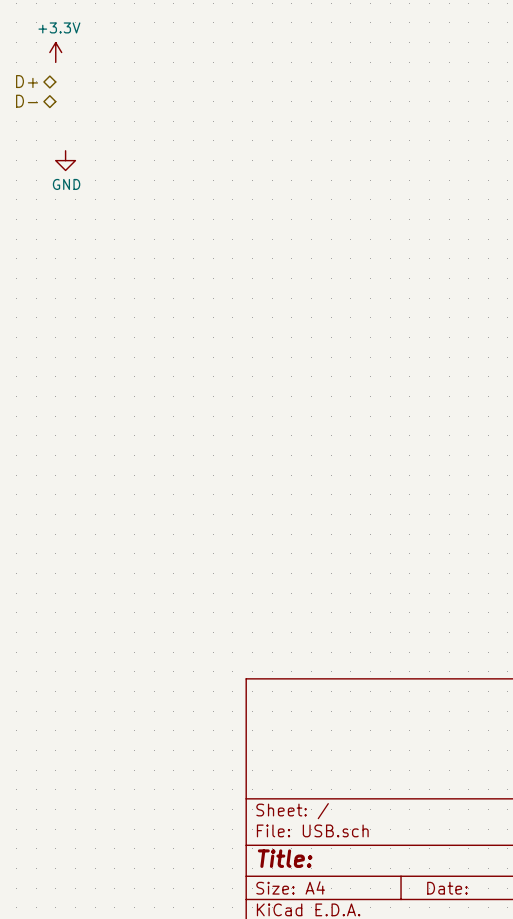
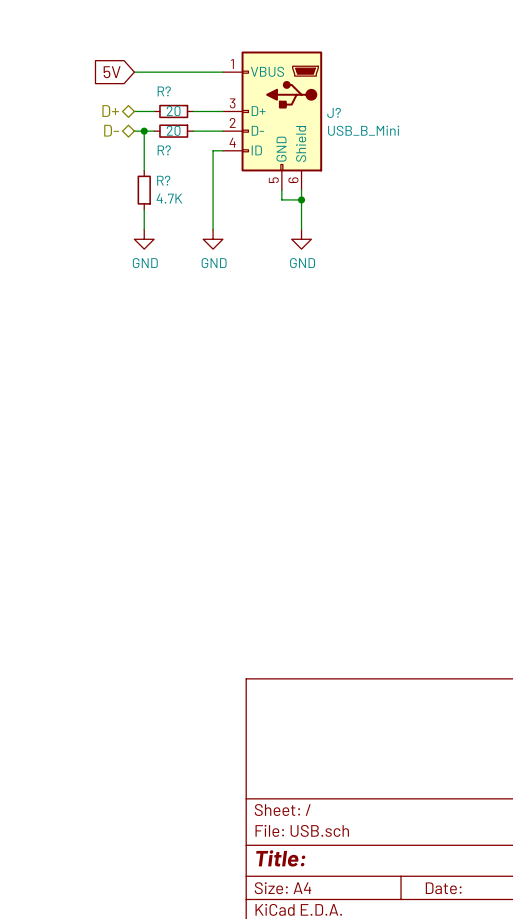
power symbol: +3.3V (55, 52) -> none
global label: none -> 5V (112, 72)
wire: none -> (134, 72) (222, 72)
hierarchical label position: D+ (27, 81) -> D+ (110, 111)
hierarchical label position: D- (27, 101) -> D- (111, 130)
wire: none -> (134, 111) (154, 111)
R?: none -> 20 (173, 111)
wire: none -> (193, 111) (222, 111)
J?: none -> USB_B_Mini (272, 120)
wire: none -> (134, 131) (154, 131)
wire: none -> (144, 131) (144, 170)
junction: none -> (144, 131)
R?: none -> 20 (173, 131)
wire: none -> (193, 131) (222, 131)
wire: none -> (222, 150) (213, 150) (213, 229)
power symbol: GND (65, 160) -> none
R?: none -> 4.7K (144, 190)
wire: none -> (281, 190) (281, 199) (301, 199)
wire: none -> (301, 190) (301, 229)
junction: none -> (301, 199)
wire: none -> (144, 209) (144, 229)
power symbol: none -> GND (144, 239)
power symbol: none -> GND (213, 239)
power symbol: none -> GND (301, 239)

